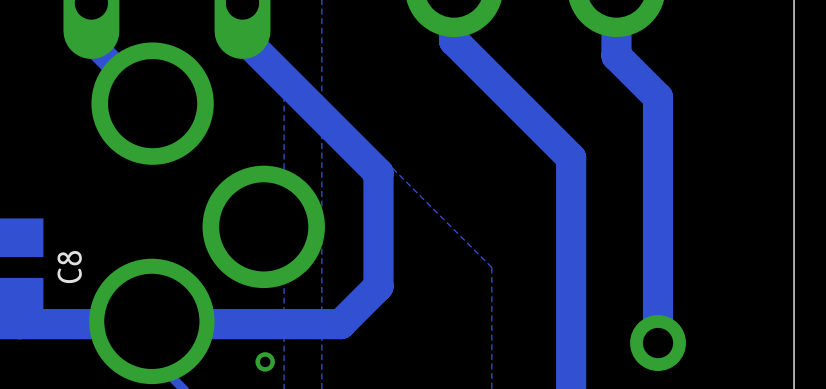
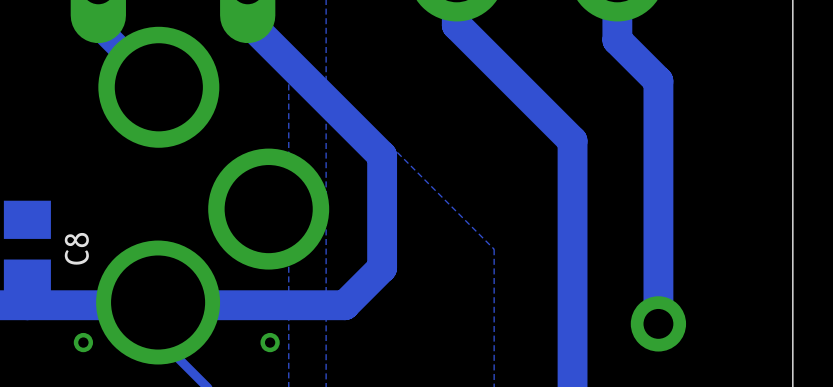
via: none -> (83, 342)

